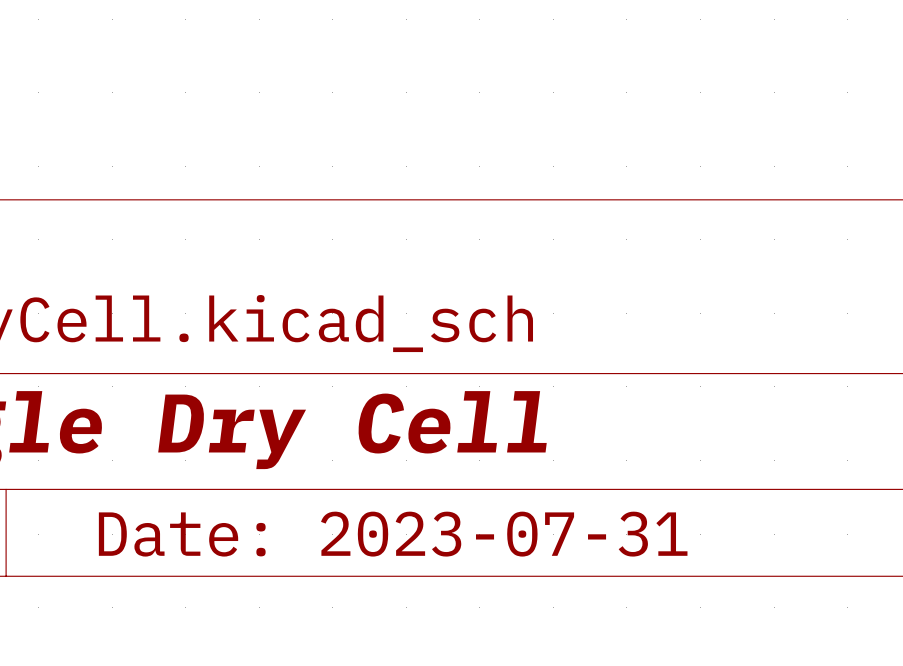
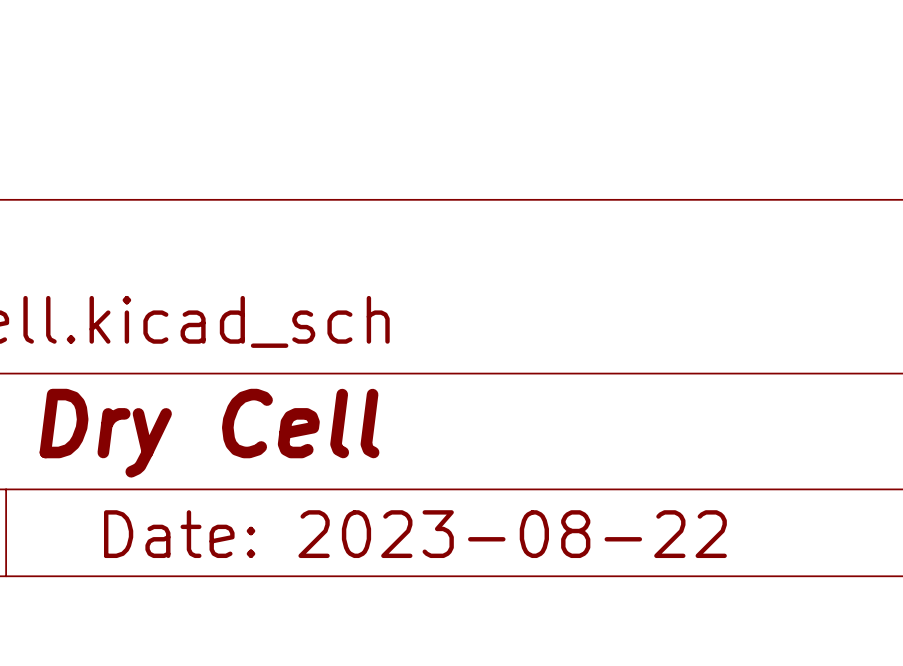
title block: Date: 2023-07-31 (393, 534) -> Date: 2023-08-22 (415, 534)

